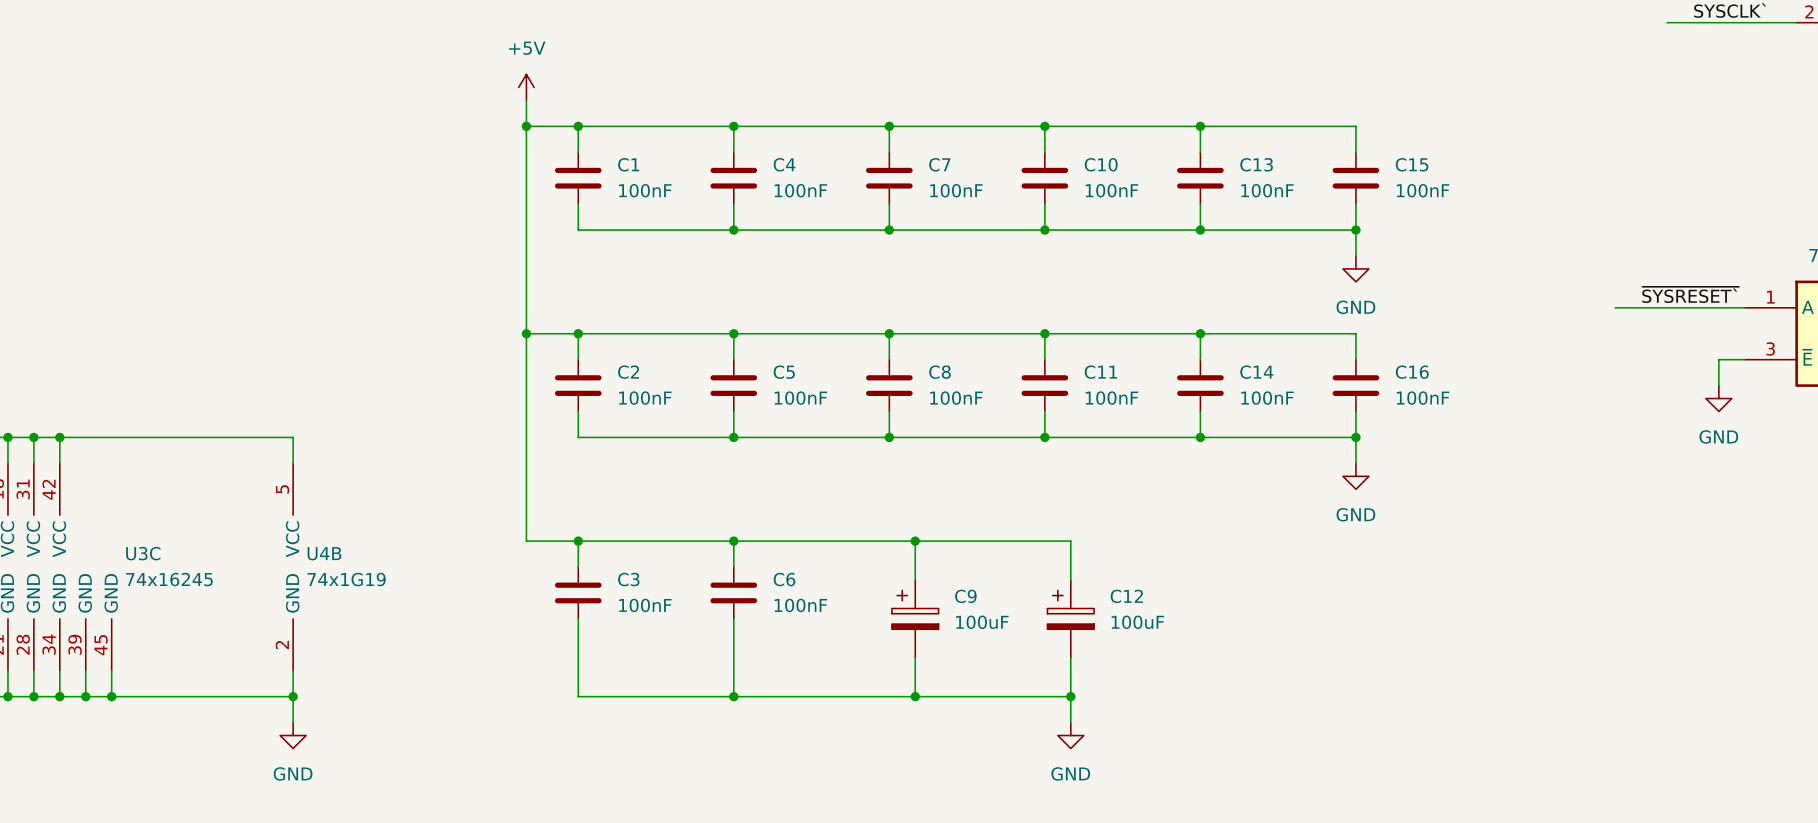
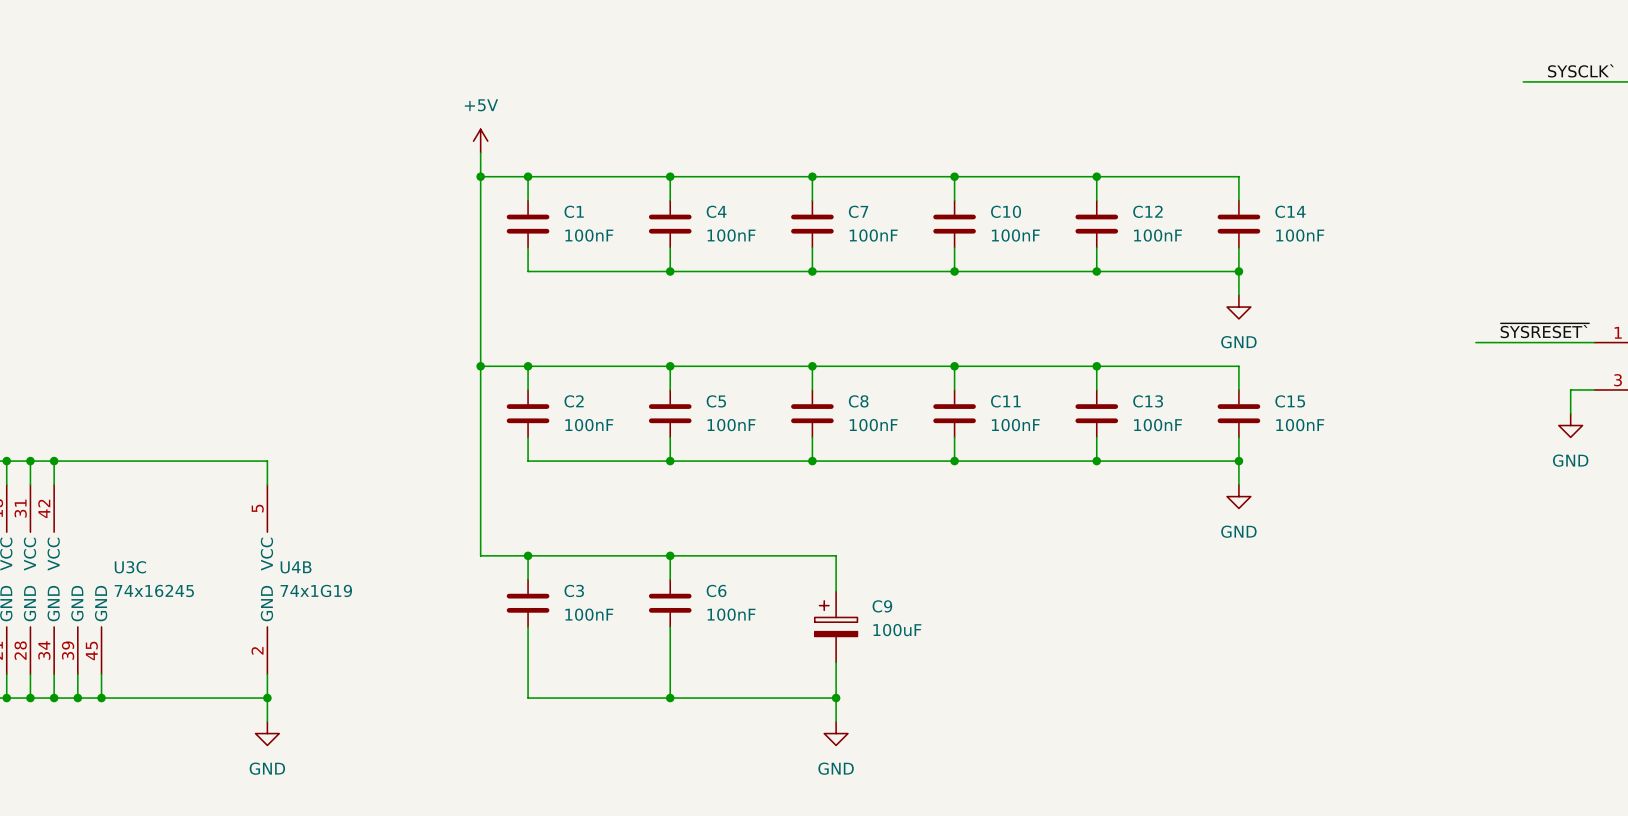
C13 name: C13 (1256, 164) -> C12 (1147, 211)
C15 name: C15 (1412, 164) -> C14 (1290, 211)
C14 name: C14 (1256, 372) -> C13 (1148, 401)
C16 name: C16 (1412, 372) -> C15 (1290, 401)
wire: (915, 541) (1070, 541) (1070, 580) -> none
junction: (915, 541) -> none
C12: 100uF (1070, 618) -> none
wire: (1070, 657) (1070, 722) -> none
wire: (915, 696) (1070, 696) -> (836, 698) (836, 721)
junction: (1070, 696) -> none
power symbol position: GND (1070, 735) -> GND (836, 733)

